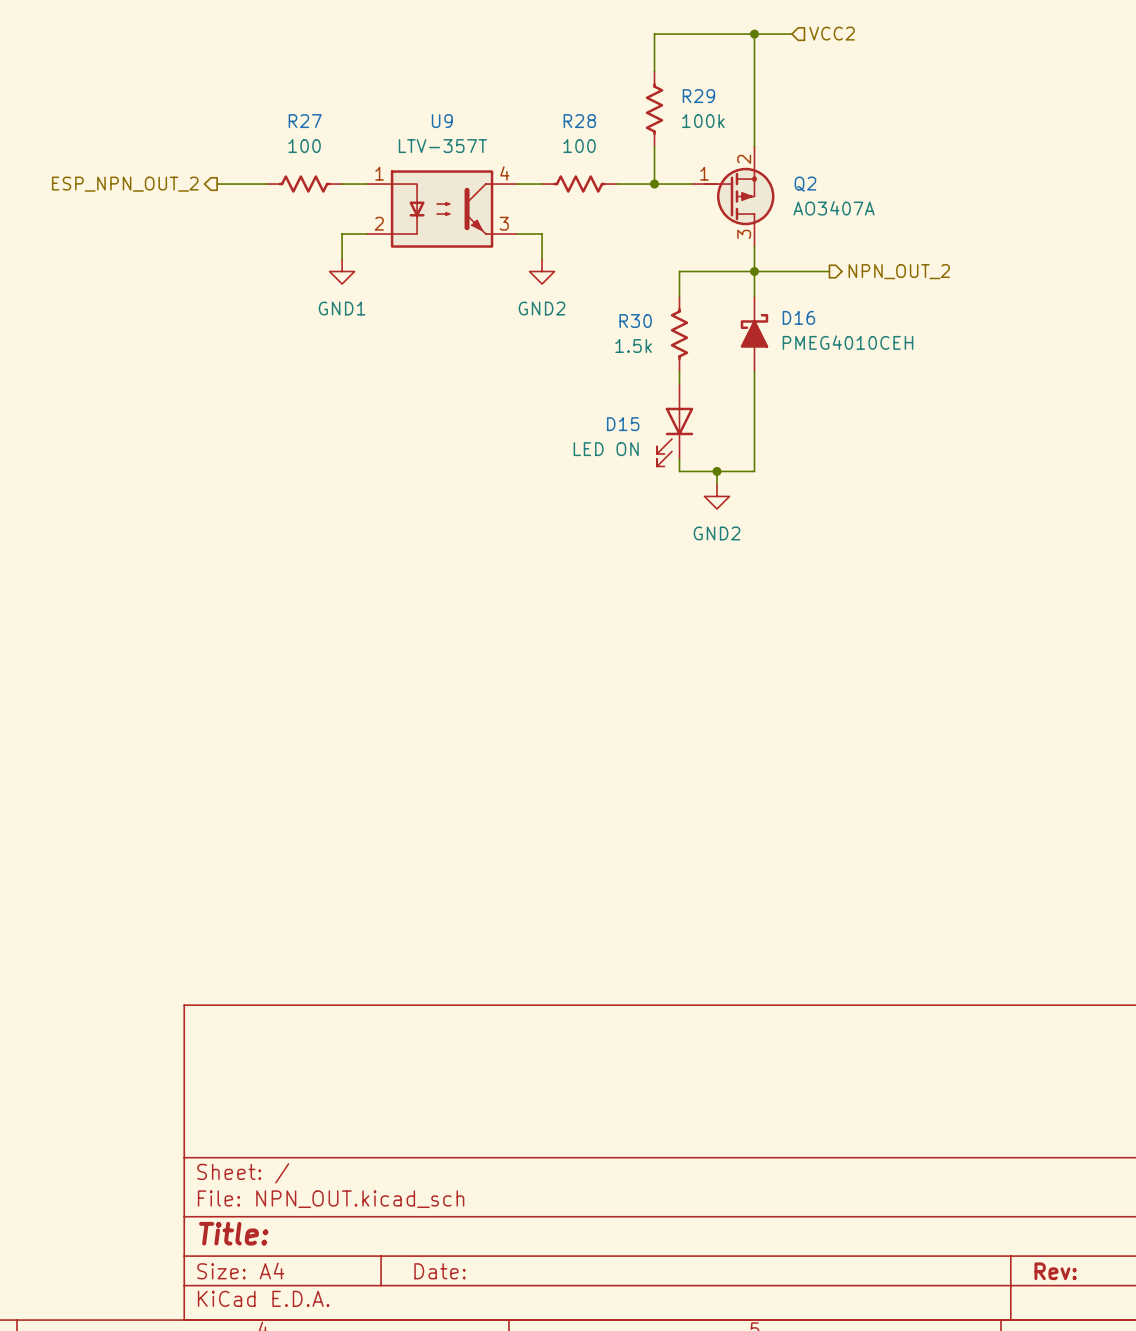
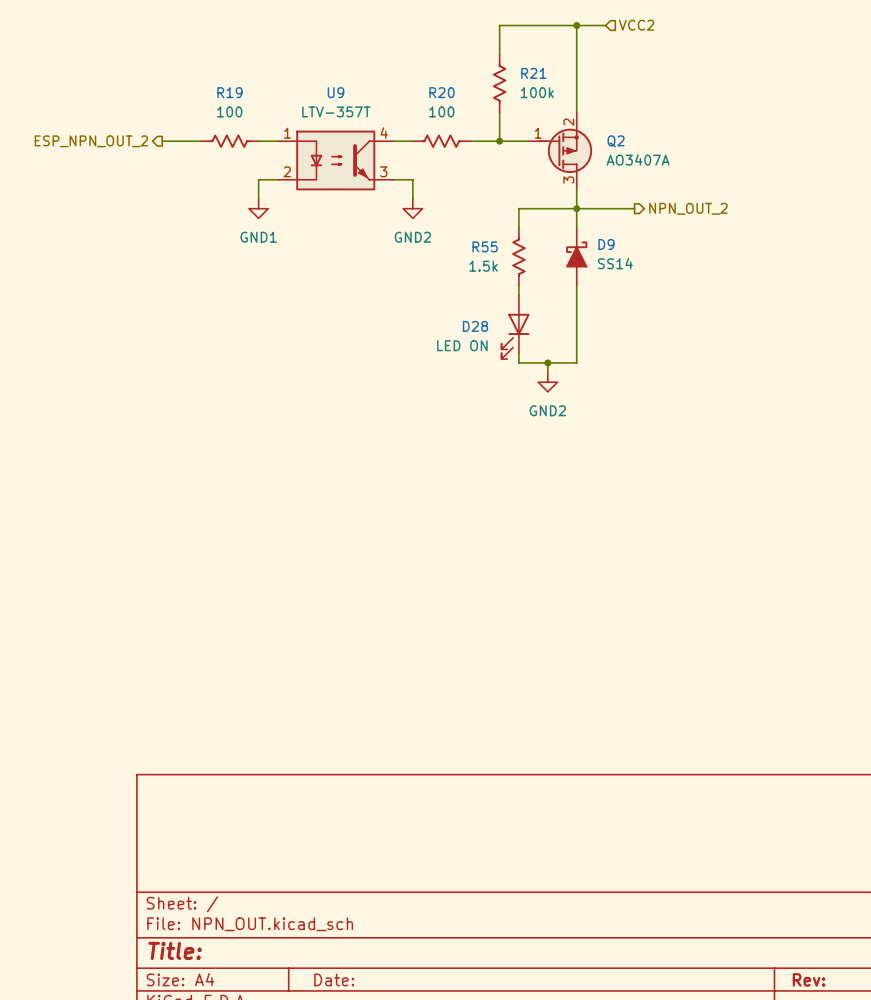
R29 name: R29 (698, 96) -> R21 (533, 73)
R27 name: R27 (305, 121) -> R19 (229, 92)
R28 name: R28 (579, 121) -> R20 (442, 92)
D16 name: D16 (798, 317) -> D9 (606, 244)
R30 name: R30 (635, 321) -> R55 (485, 246)
D16 value: PMEG4010CEH (848, 342) -> SS14 (615, 263)
D15 name: D15 (623, 424) -> D28 (475, 326)

